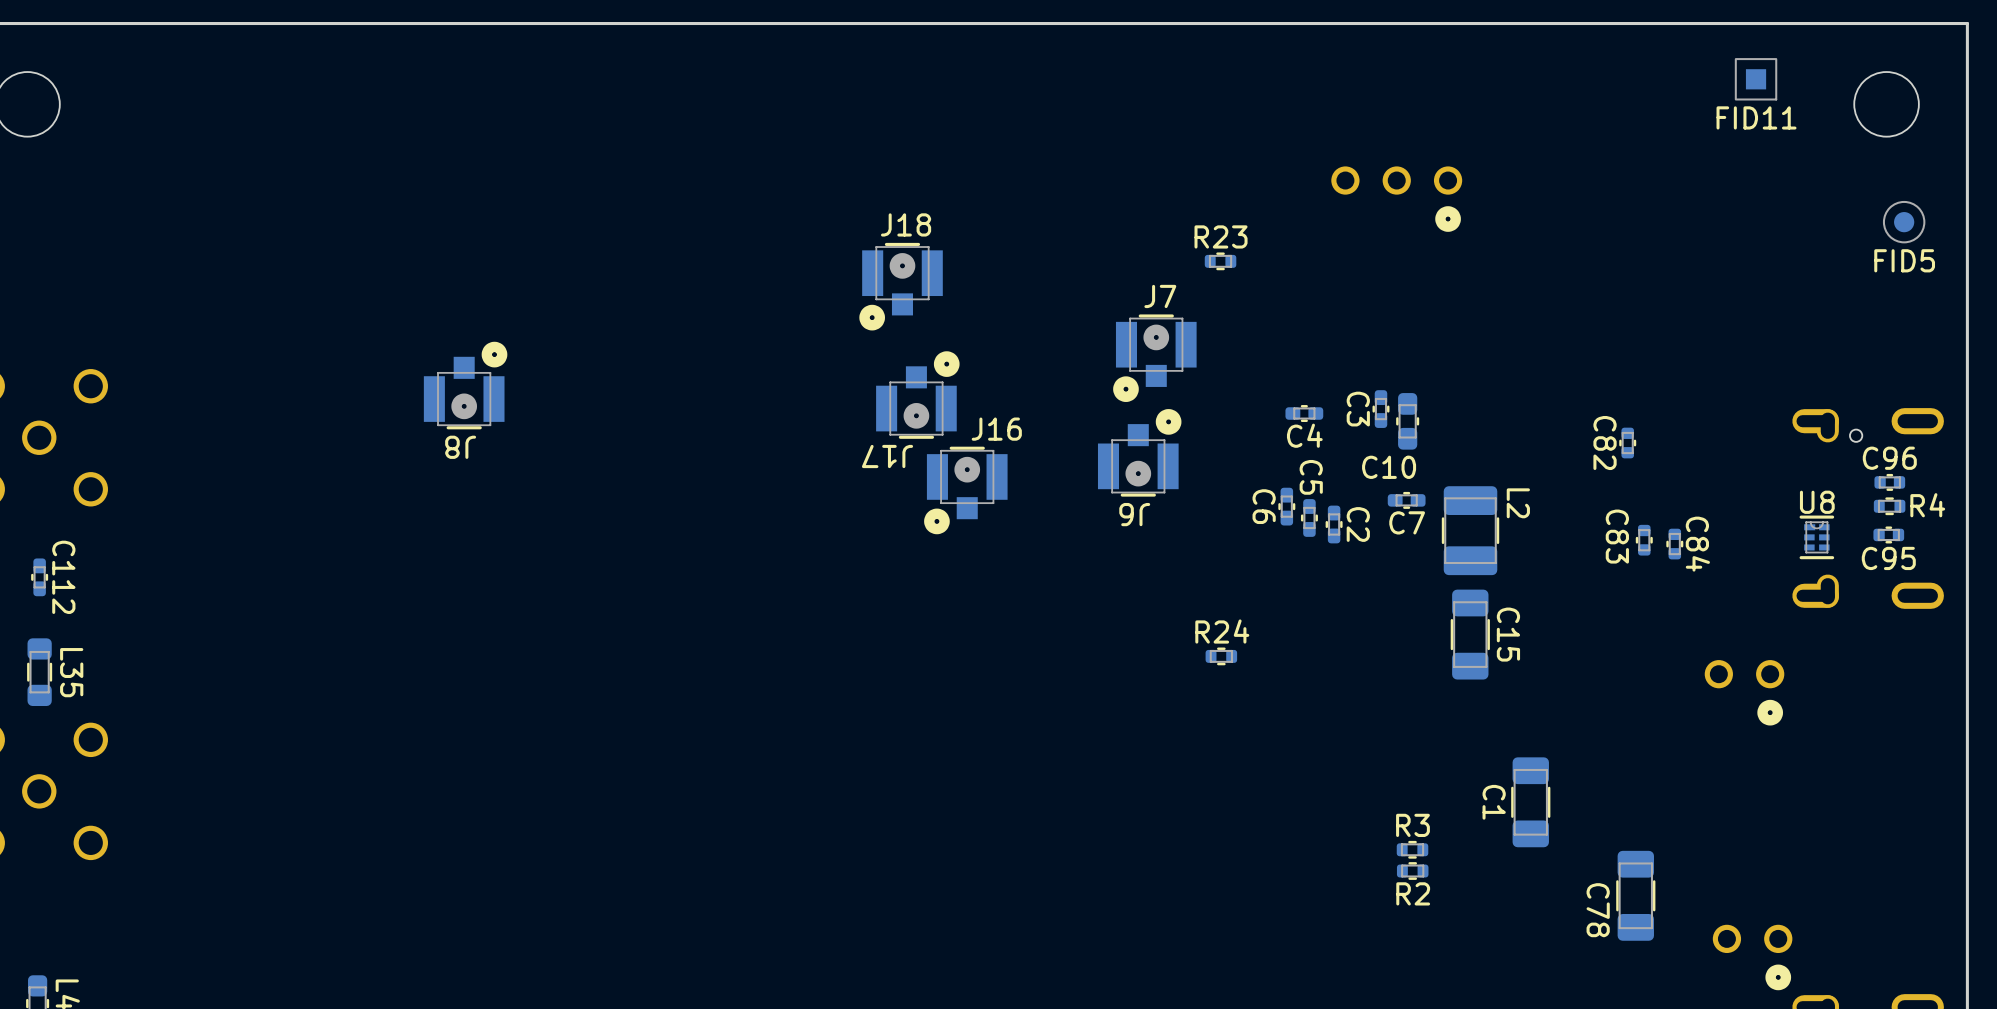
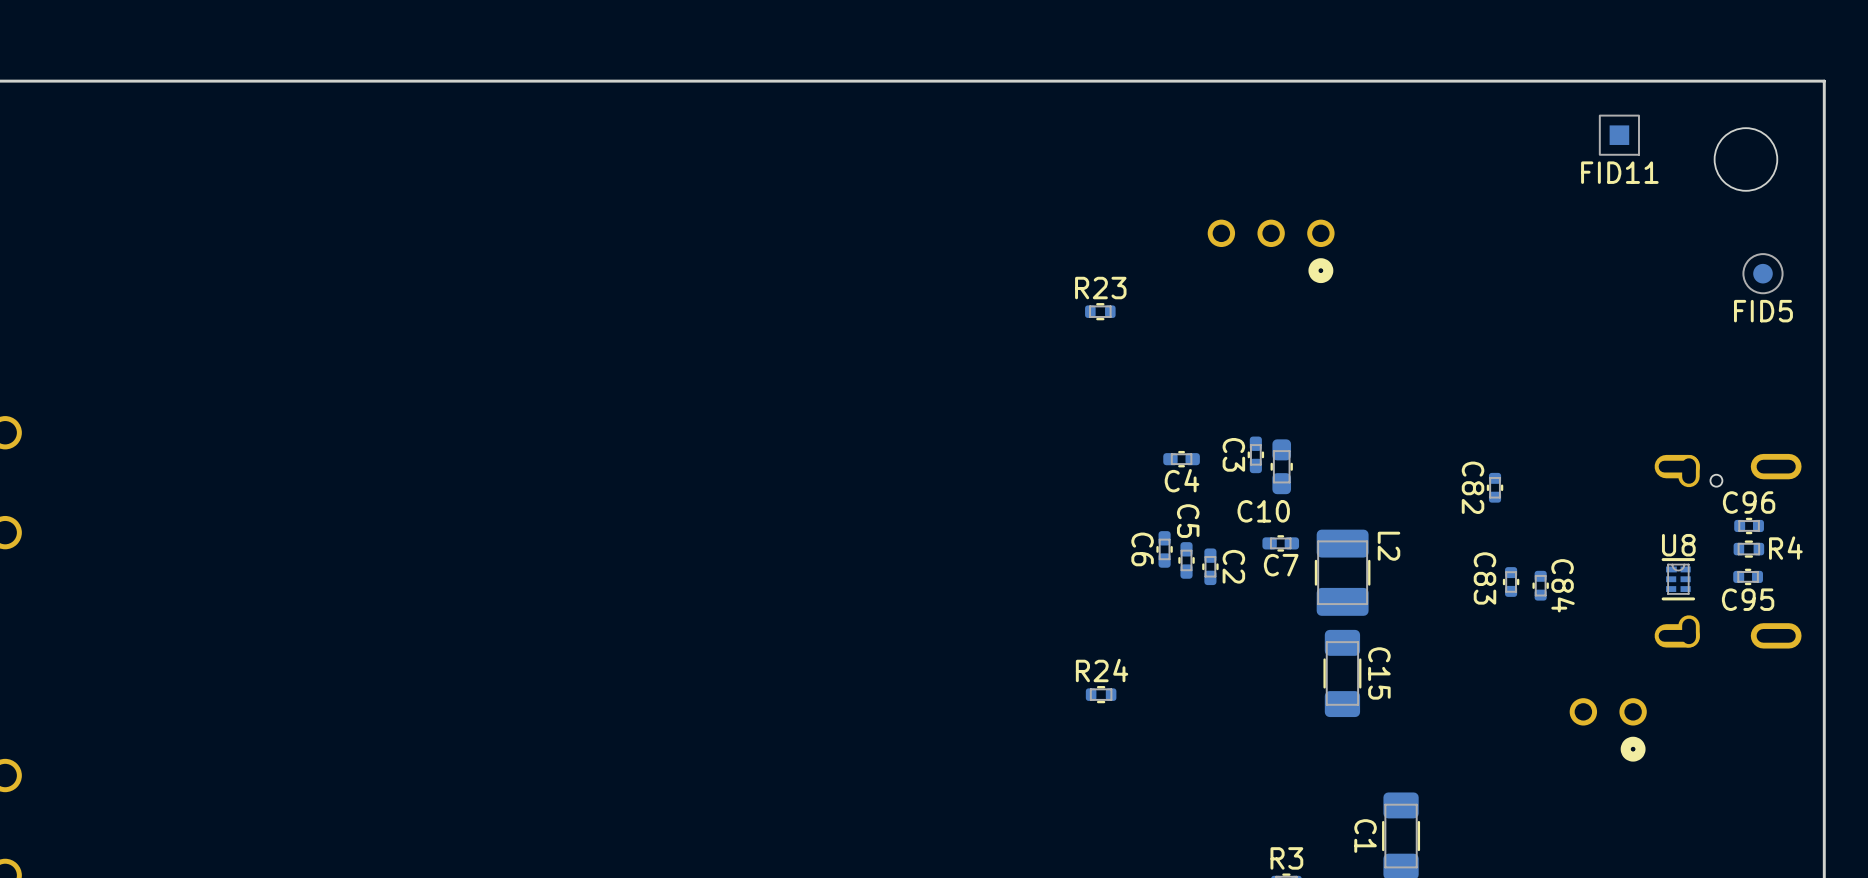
J18: (901, 286) -> none
J7: (1154, 358) -> none
J8: (465, 385) -> none
J17: (917, 395) -> none
J6: (1139, 452) -> none
J16: (965, 490) -> none

